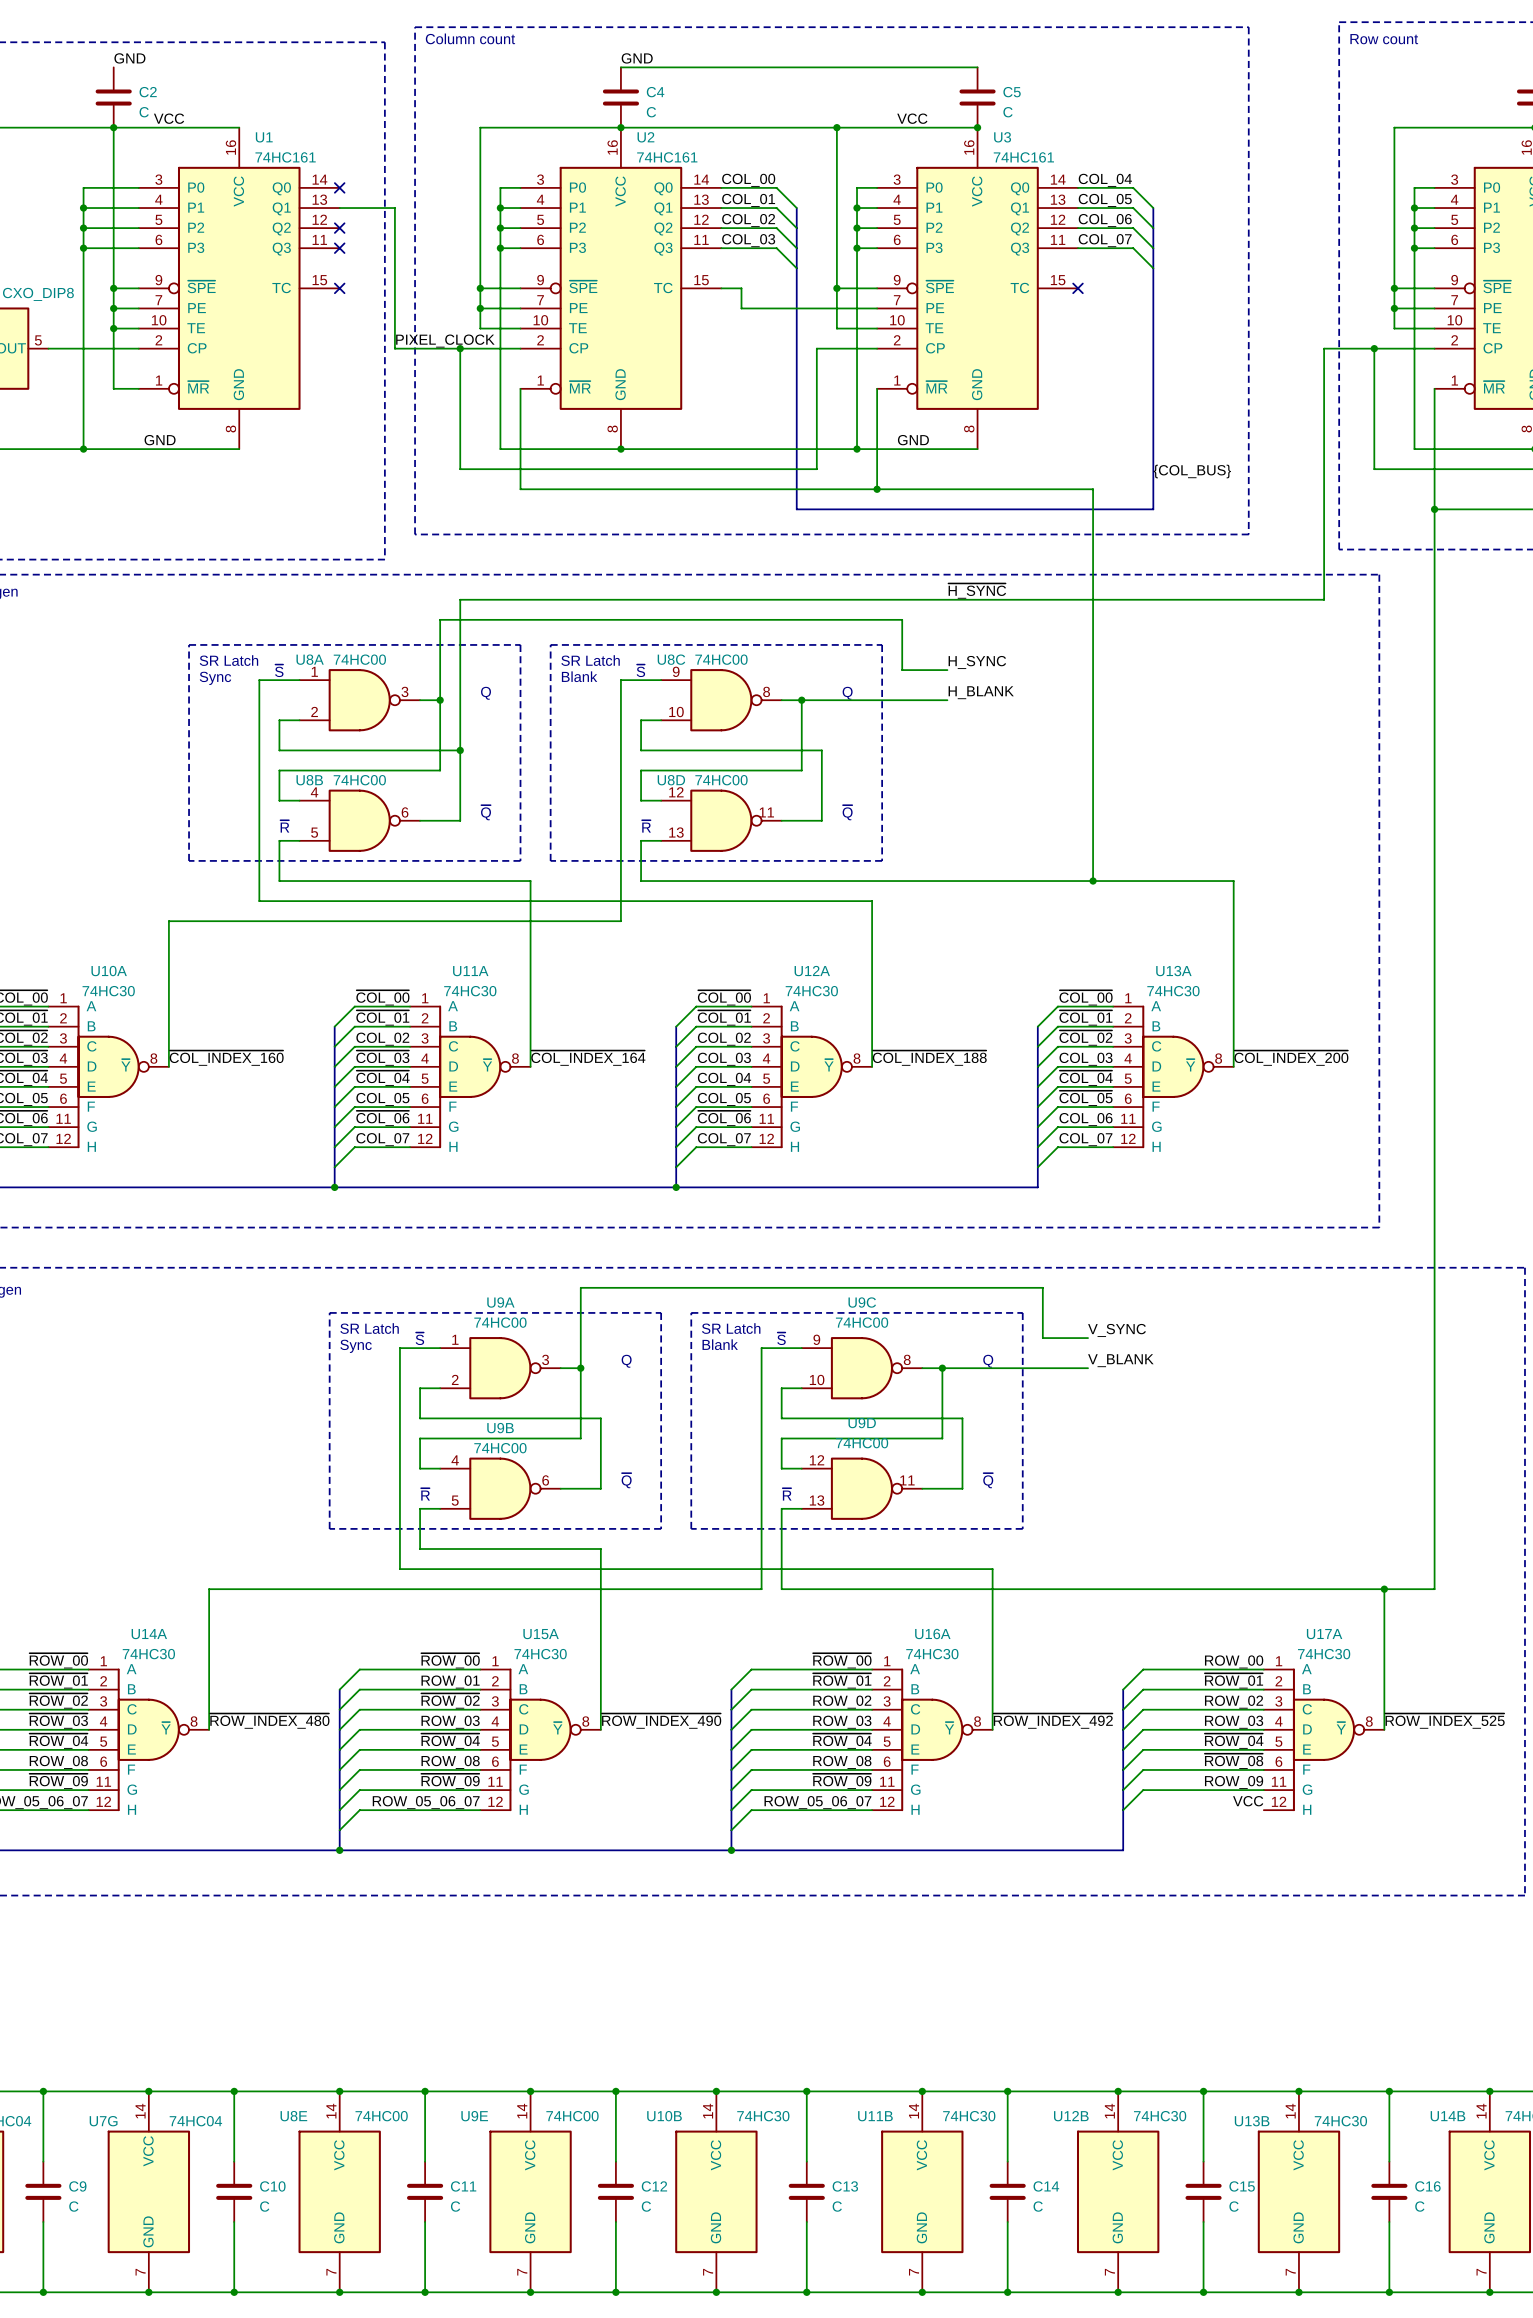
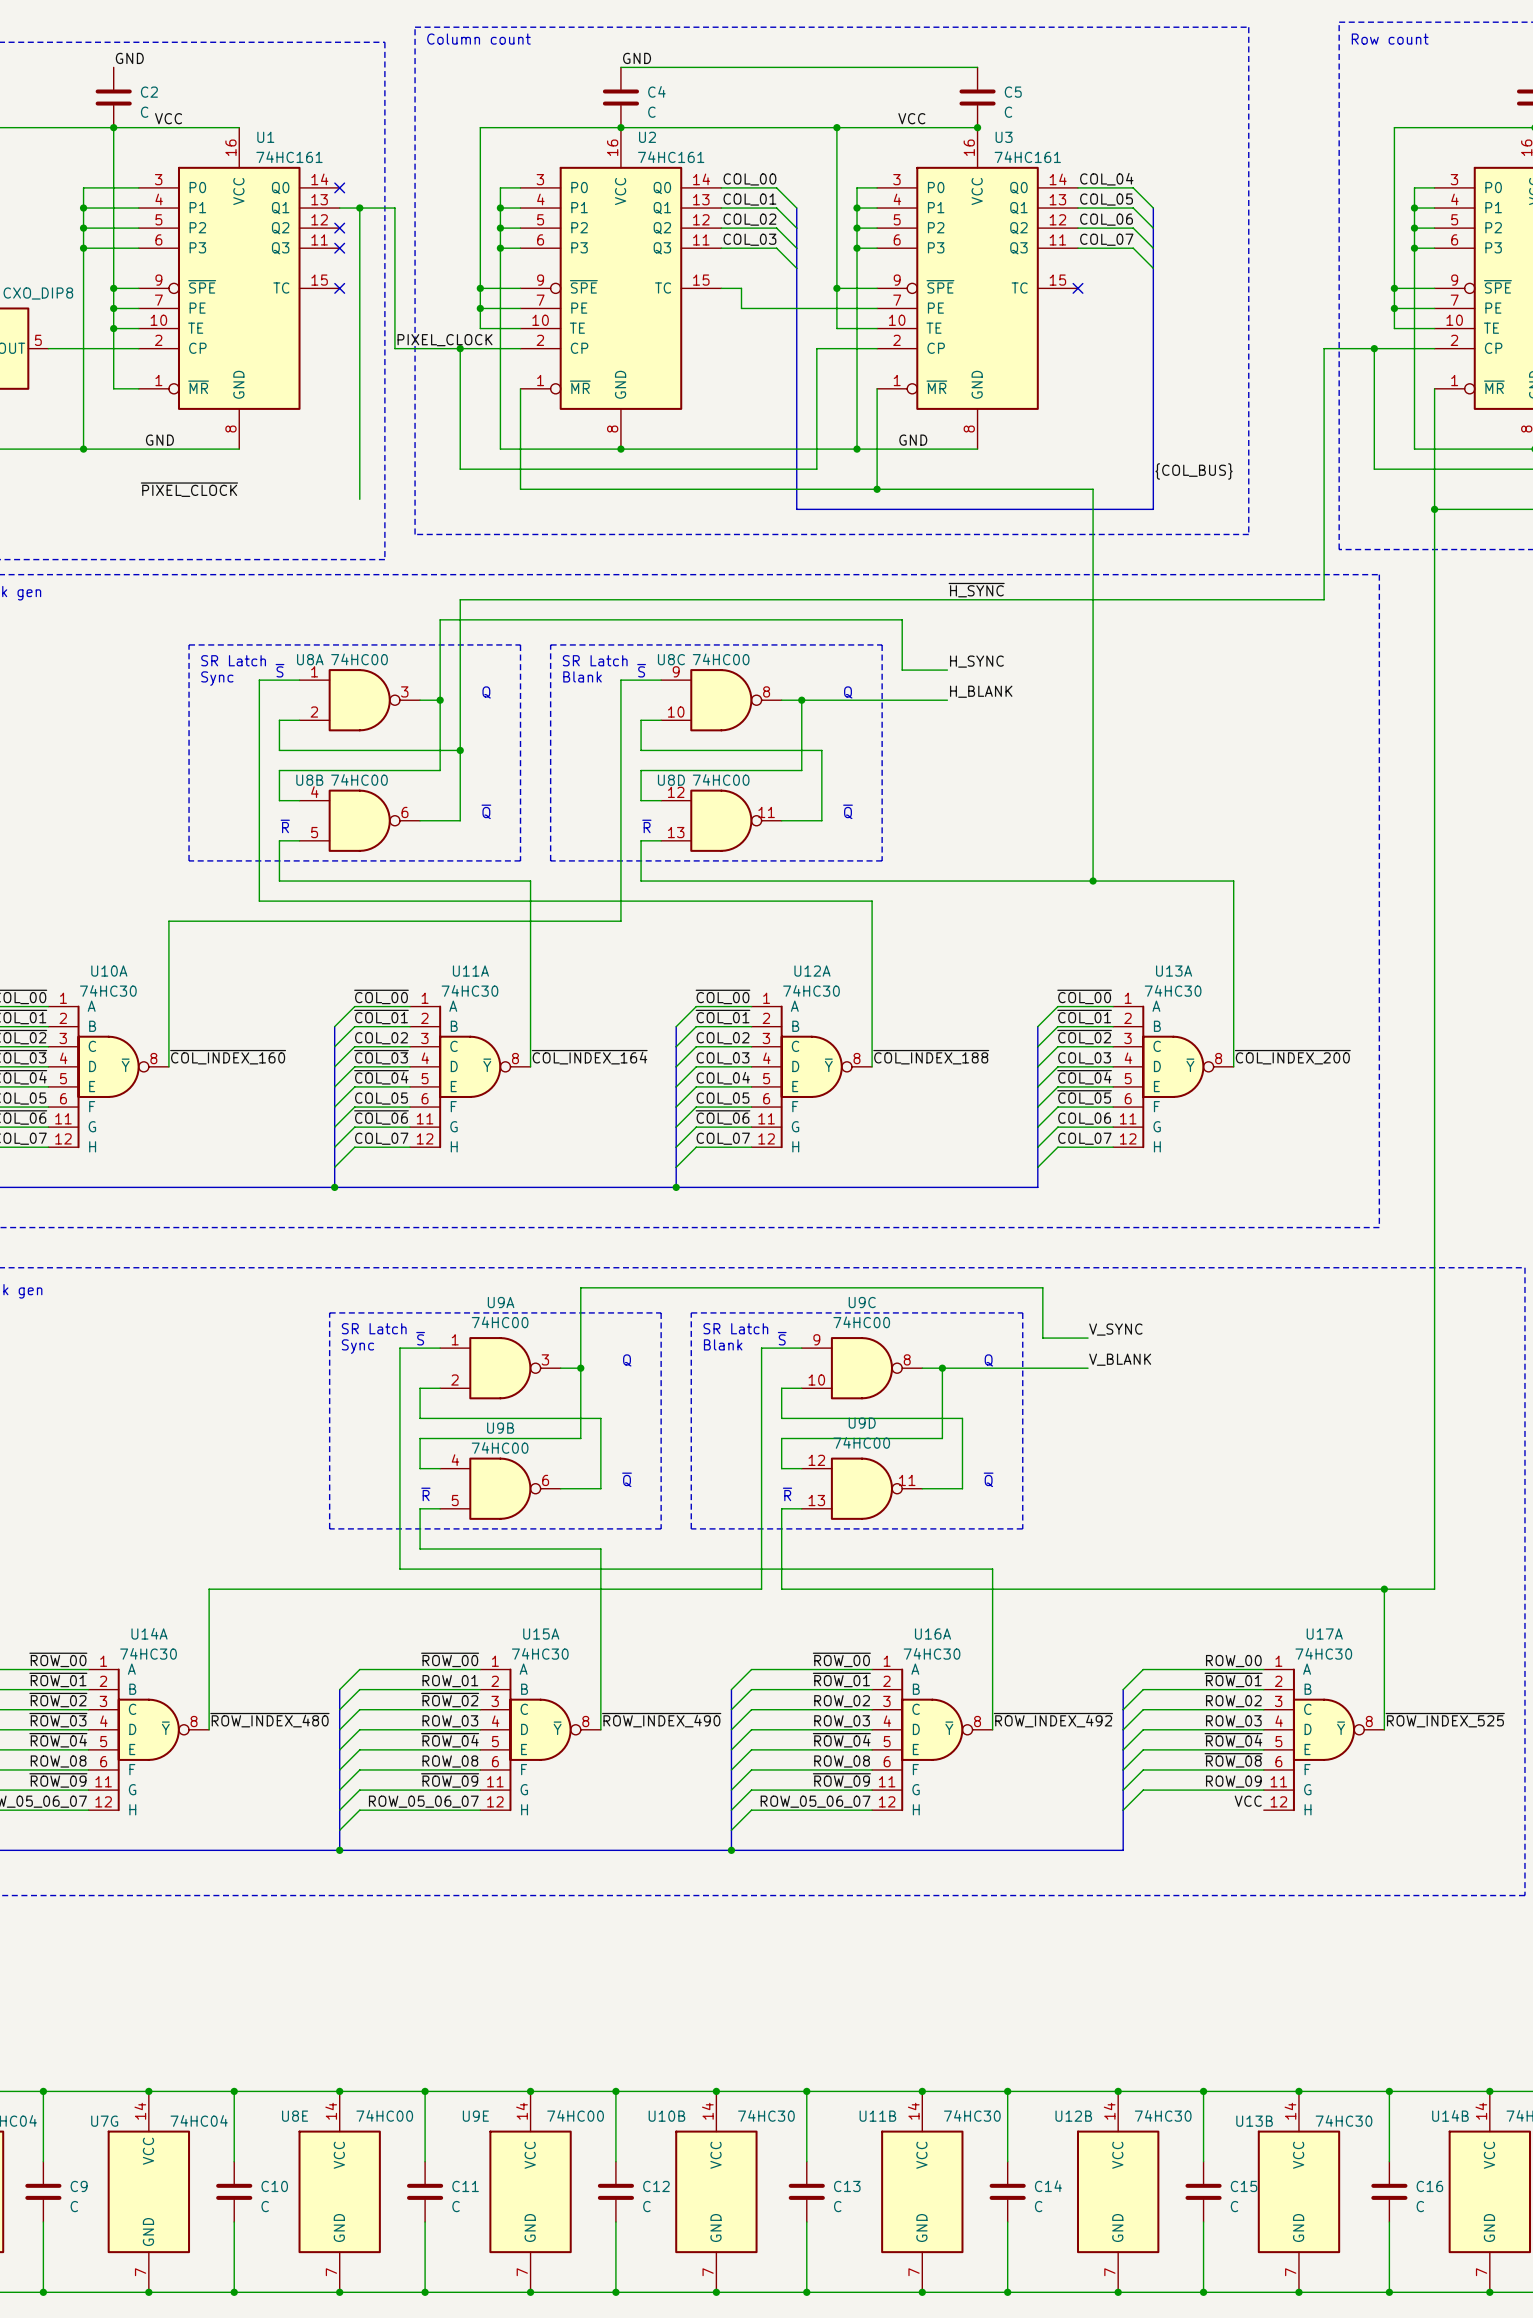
wire: none -> (359, 208) (359, 499)
junction: none -> (359, 208)
label: none -> ~{PIXEL_CLOCK} (189, 489)

